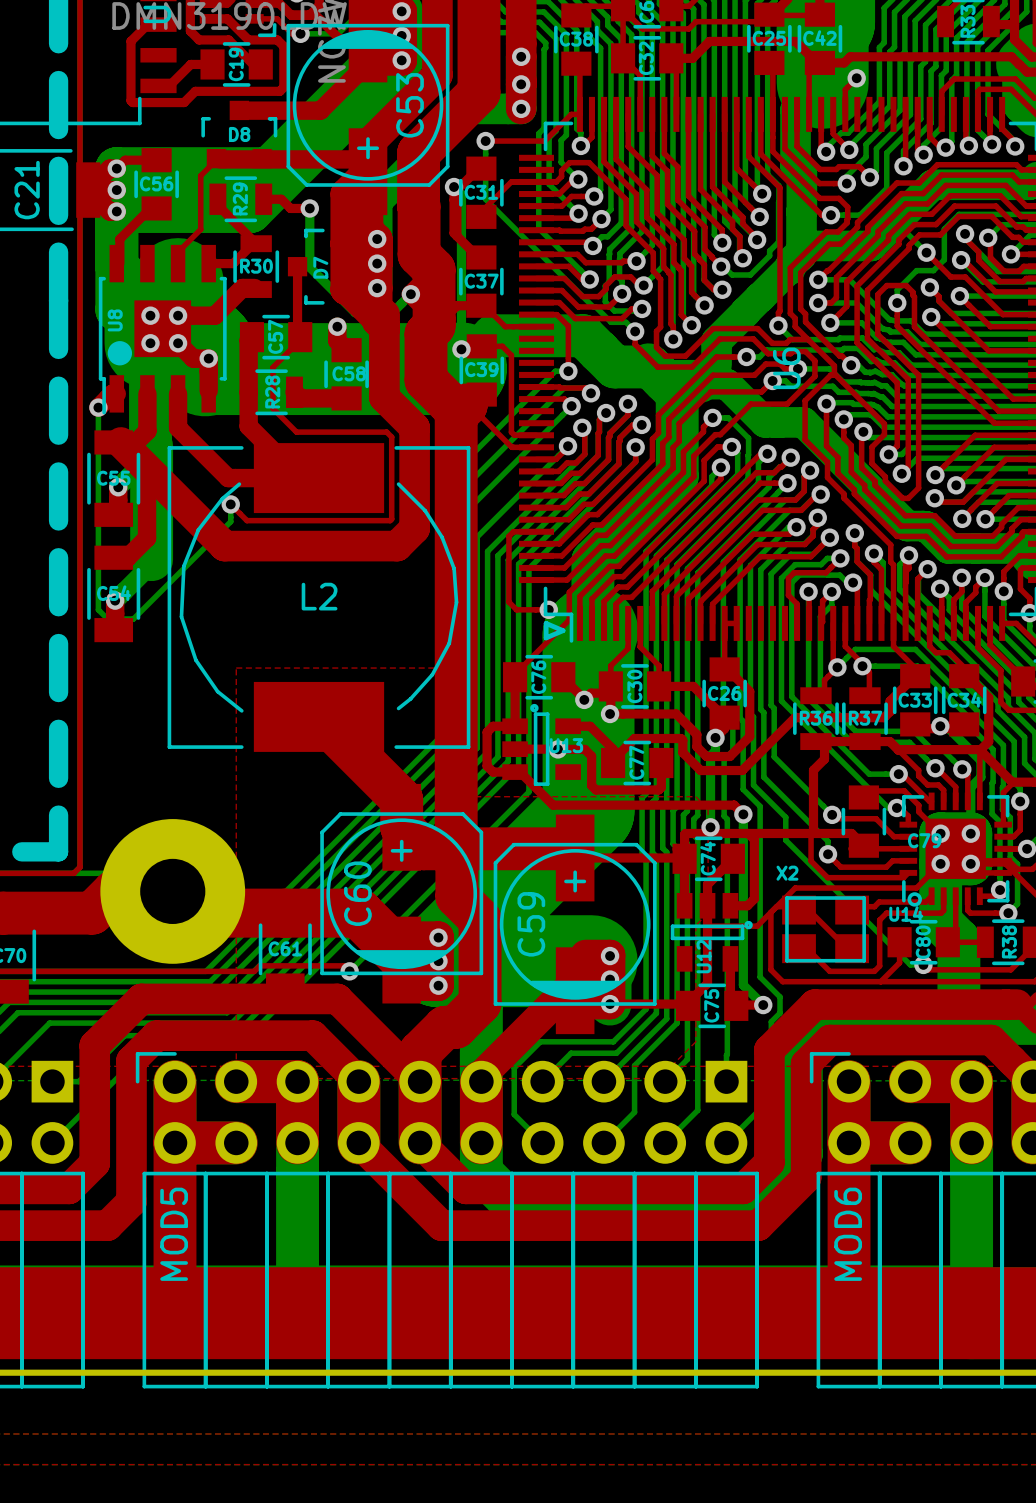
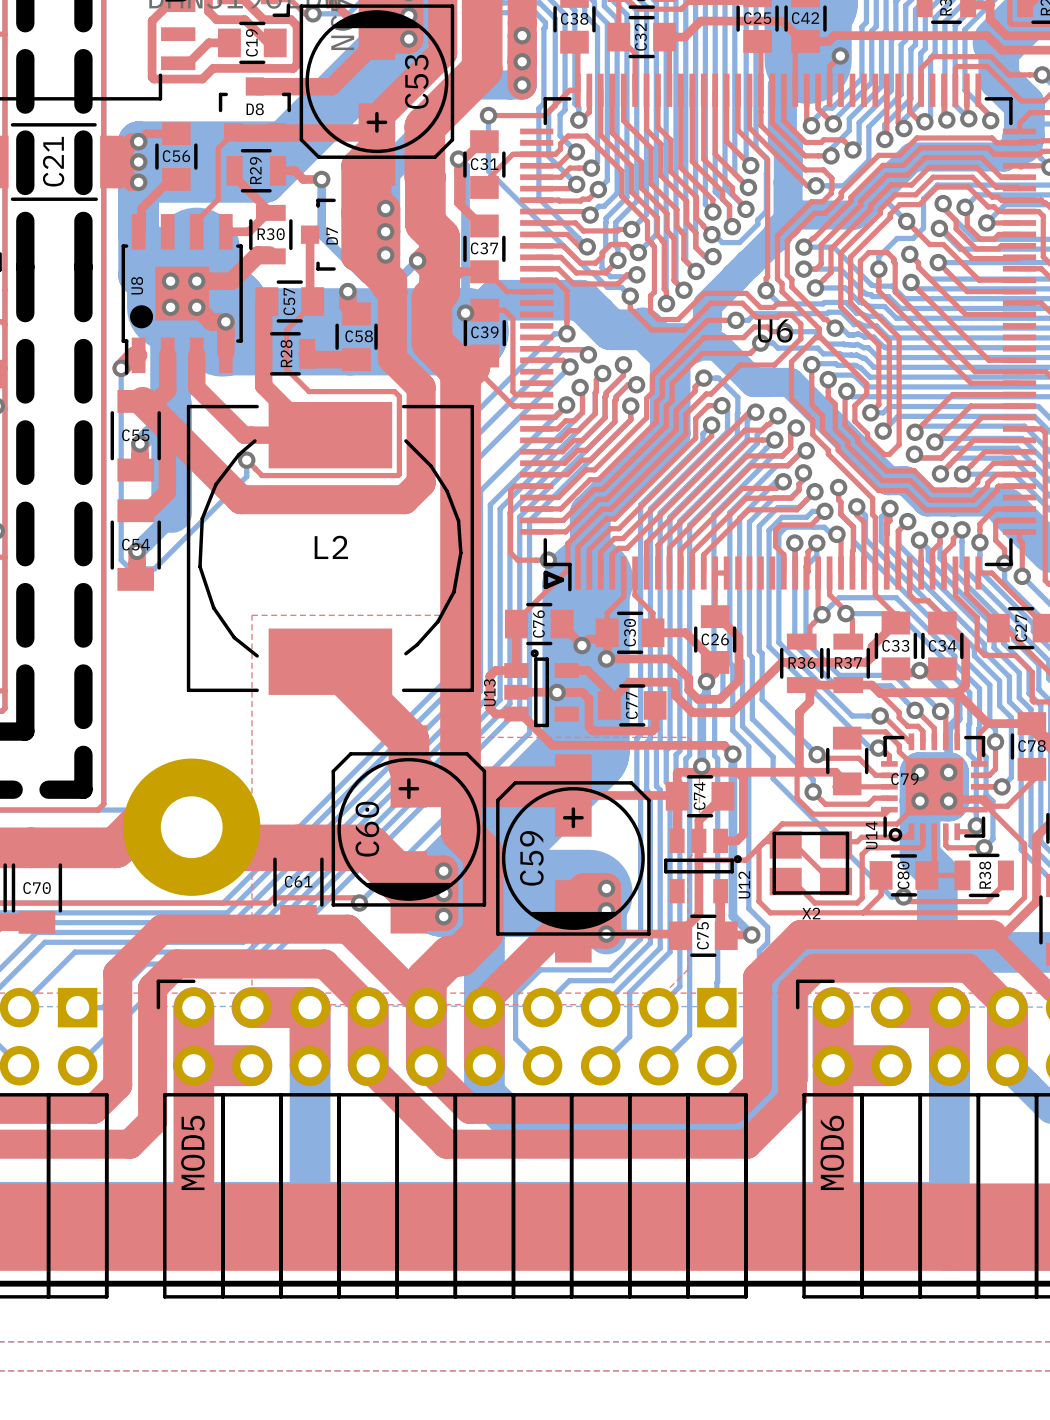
U6 name rotation: 0° (786, 368) -> 90° clockwise (775, 331)
U13 name rotation: 0° (566, 745) -> 90° counterclockwise (489, 692)
U13 name position: U13 (566, 745) -> U13 (489, 692)
X2 name position: X2 (787, 873) -> X2 (811, 913)
U14 name rotation: 0° (906, 913) -> 90° counterclockwise (871, 835)
U12 name position: U12 (704, 956) -> U12 (744, 884)

